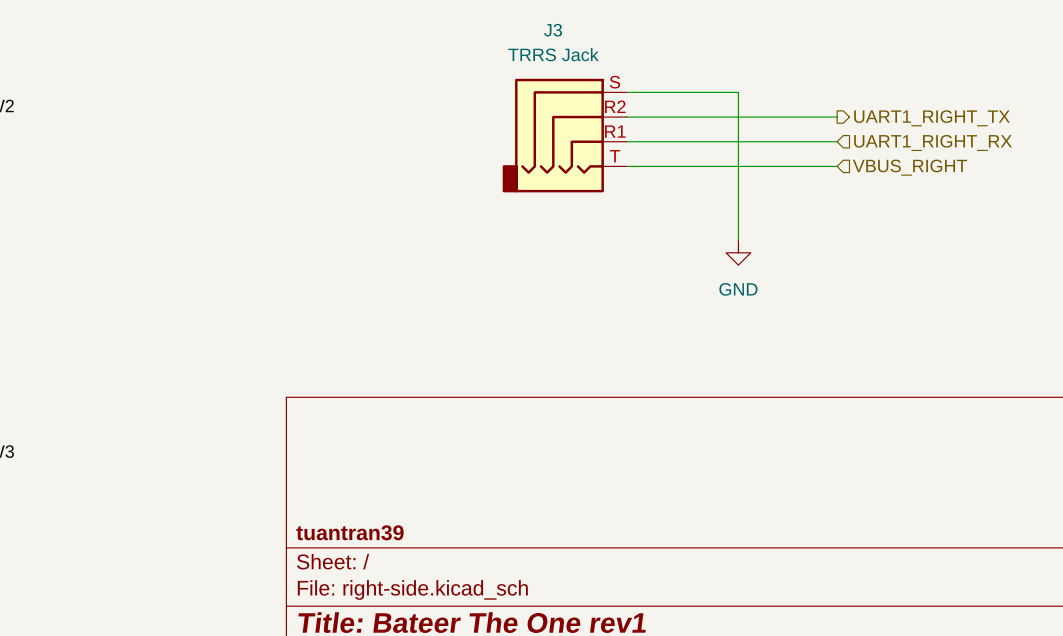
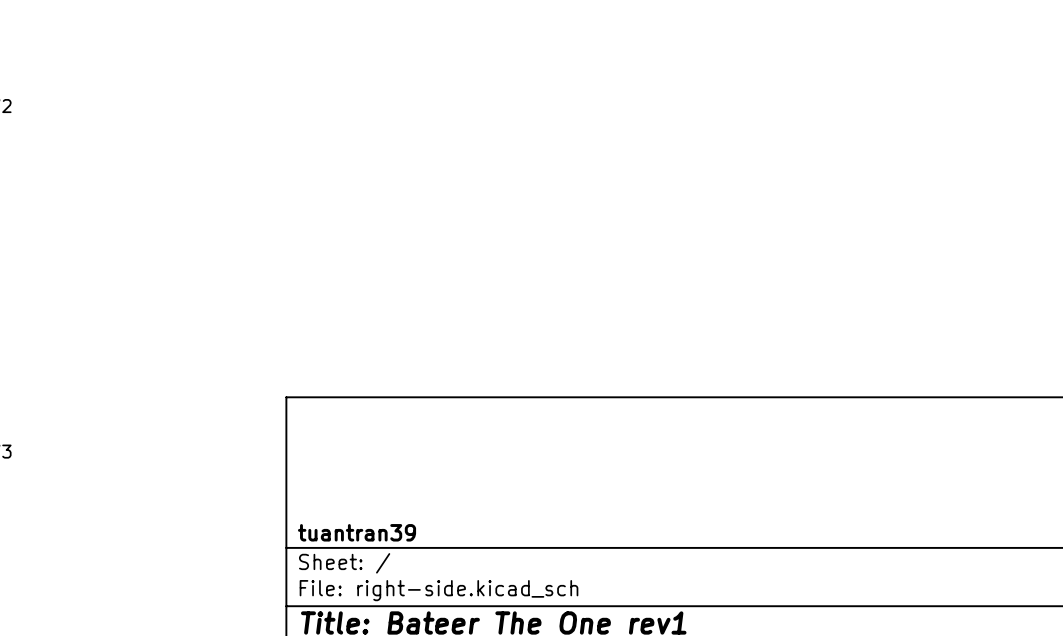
wire: (627, 92) (738, 92) (738, 240) -> none
wire: (627, 117) (837, 117) -> none
hierarchical label: UART1_RIGHT_TX (932, 118) -> none
J3: TRRS Jack (565, 135) -> none
wire: (627, 141) (837, 141) -> none
hierarchical label: UART1_RIGHT_RX (933, 142) -> none
wire: (627, 166) (837, 166) -> none
hierarchical label: VBUS_RIGHT (909, 167) -> none
power symbol: GND (738, 252) -> none

